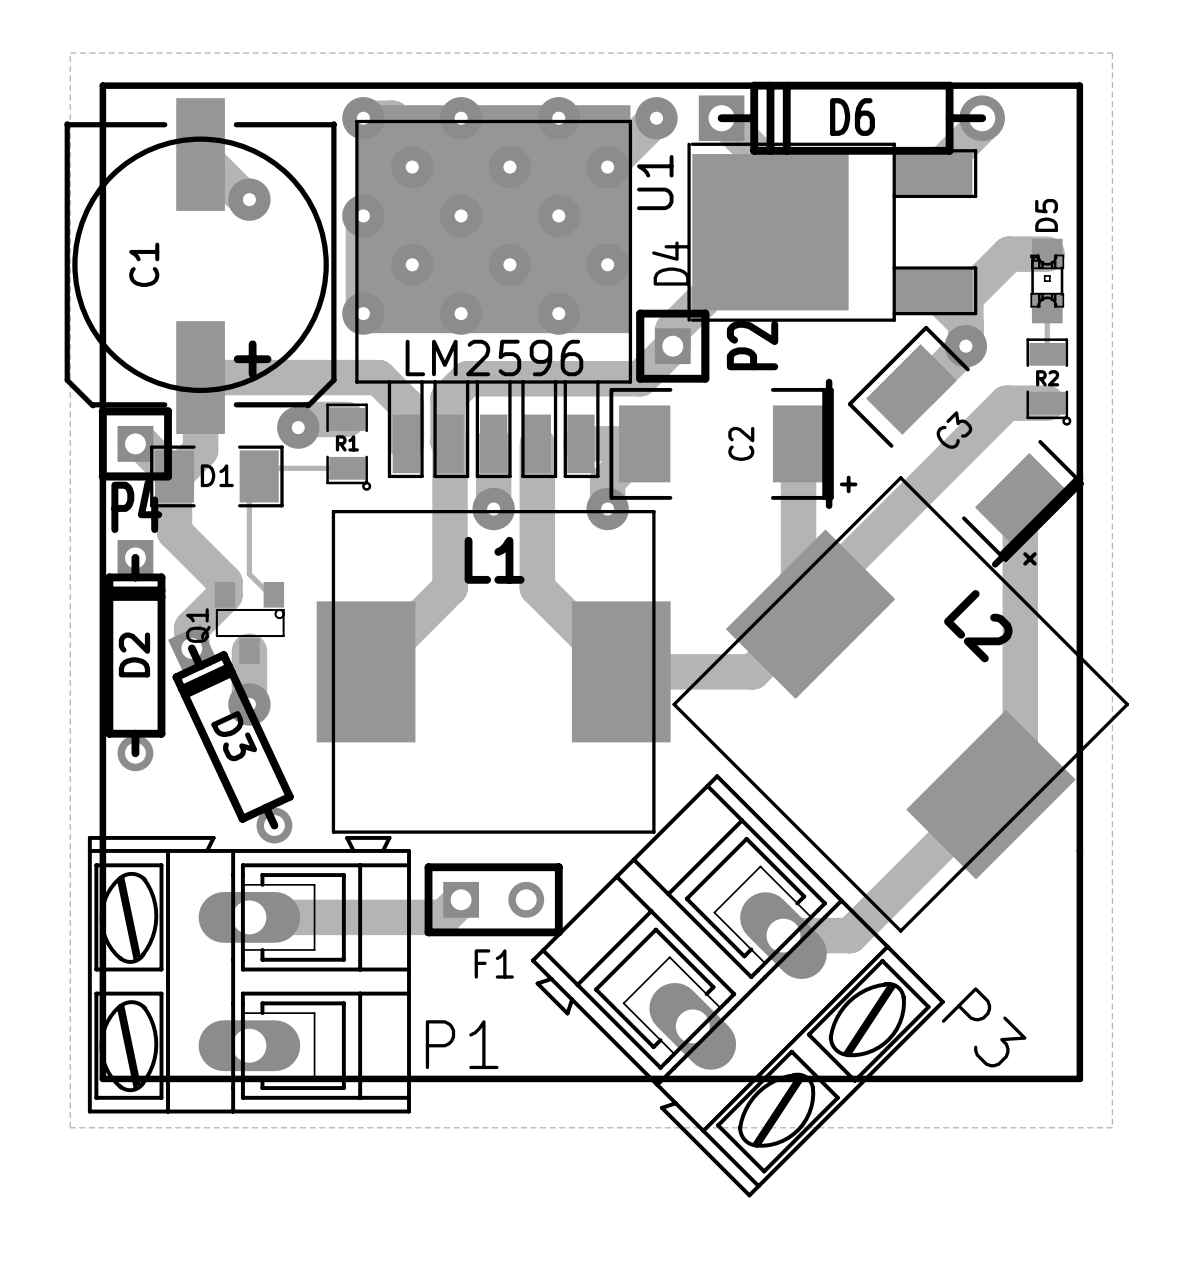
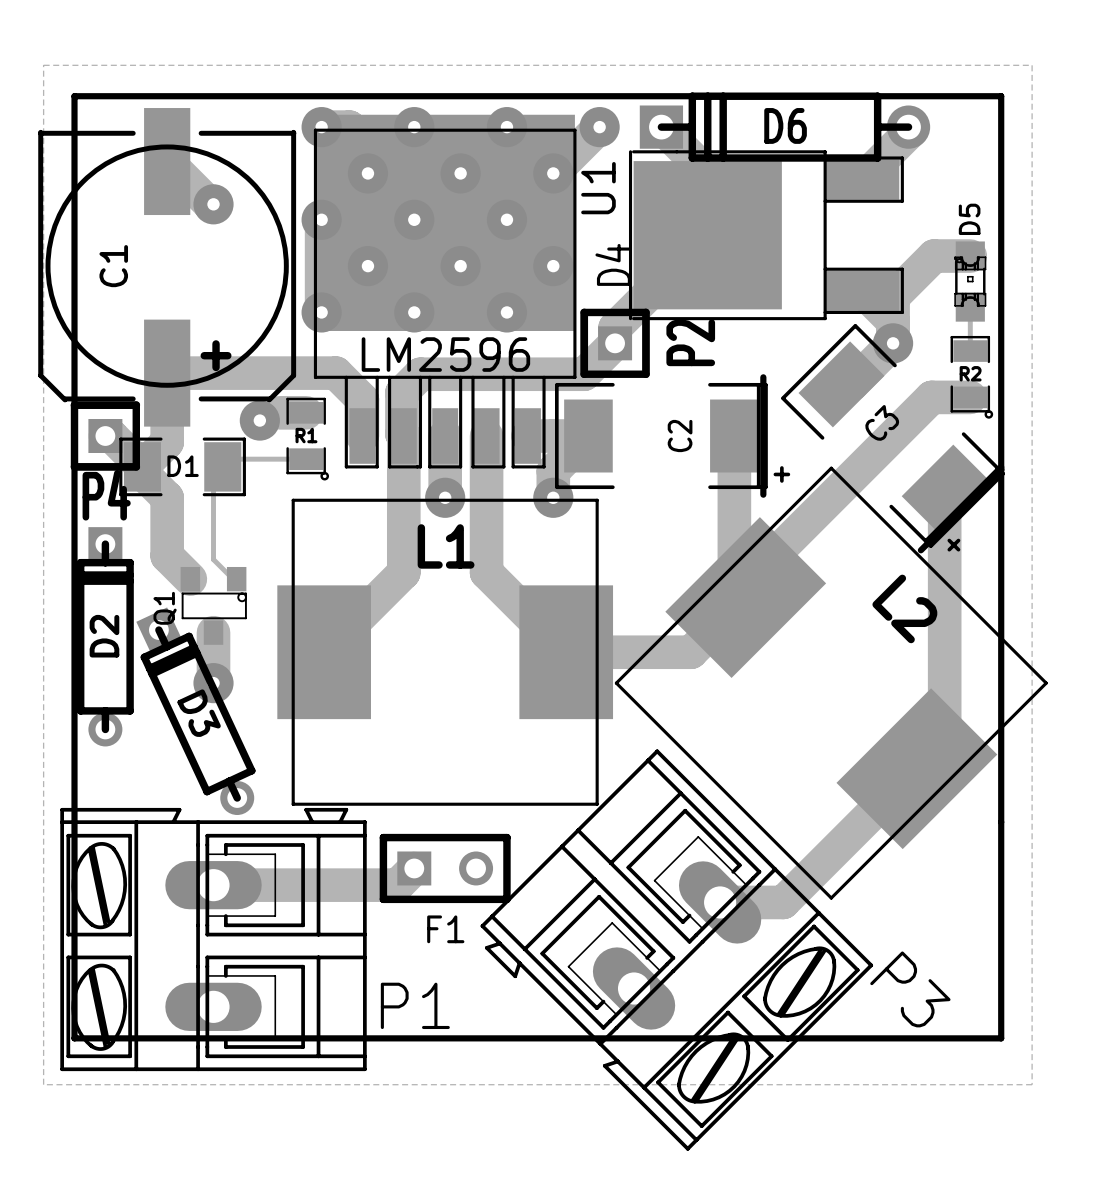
C1 footprint: [64, 98, 337, 434] -> [38, 108, 297, 427]
track: (174, 482) (174, 531) (225, 582) (225, 594) (191, 627) (191, 648) -> (142, 473) (167, 497) (167, 555) (190, 579)

